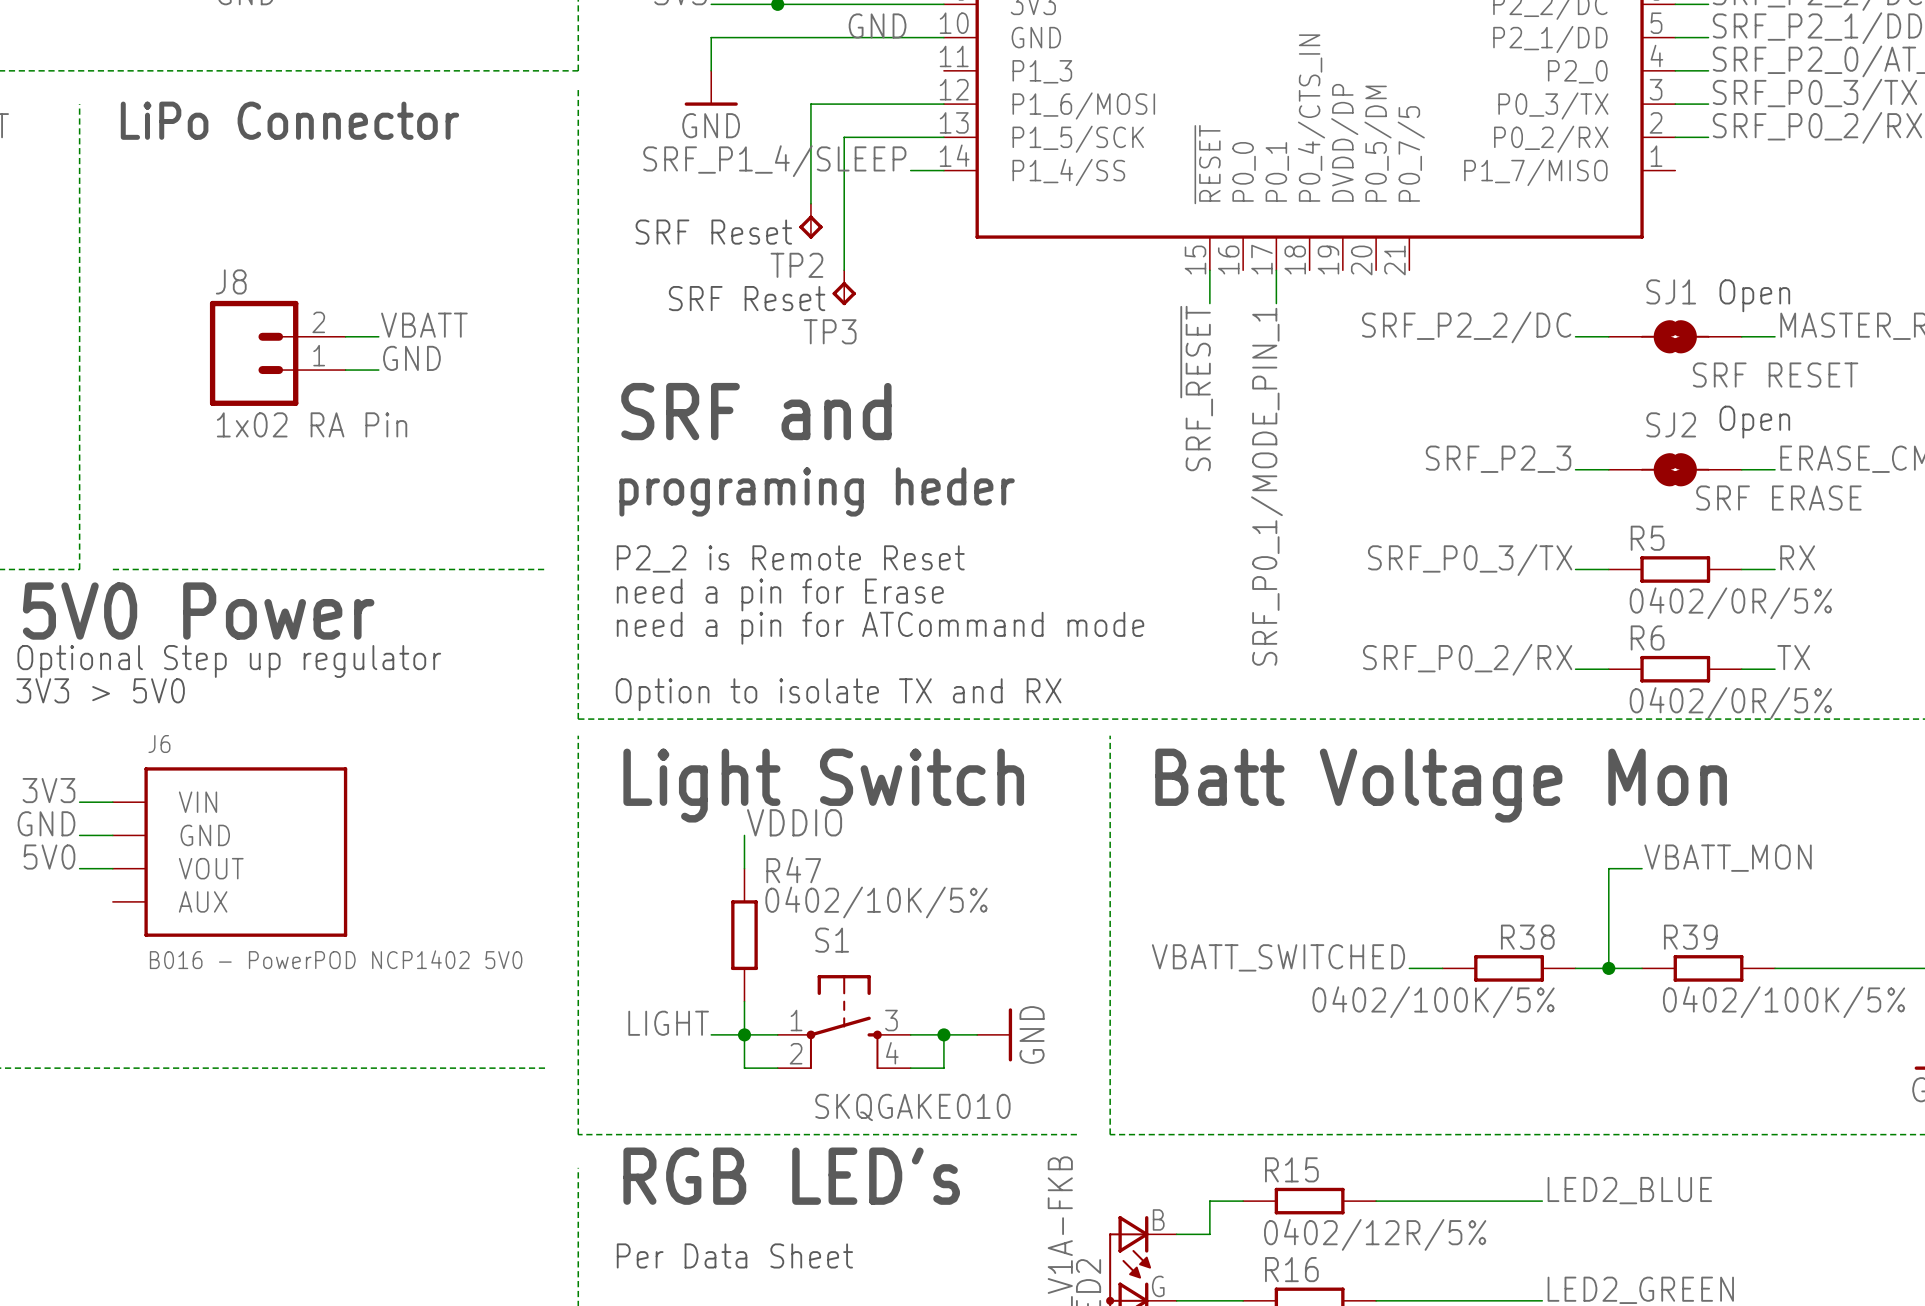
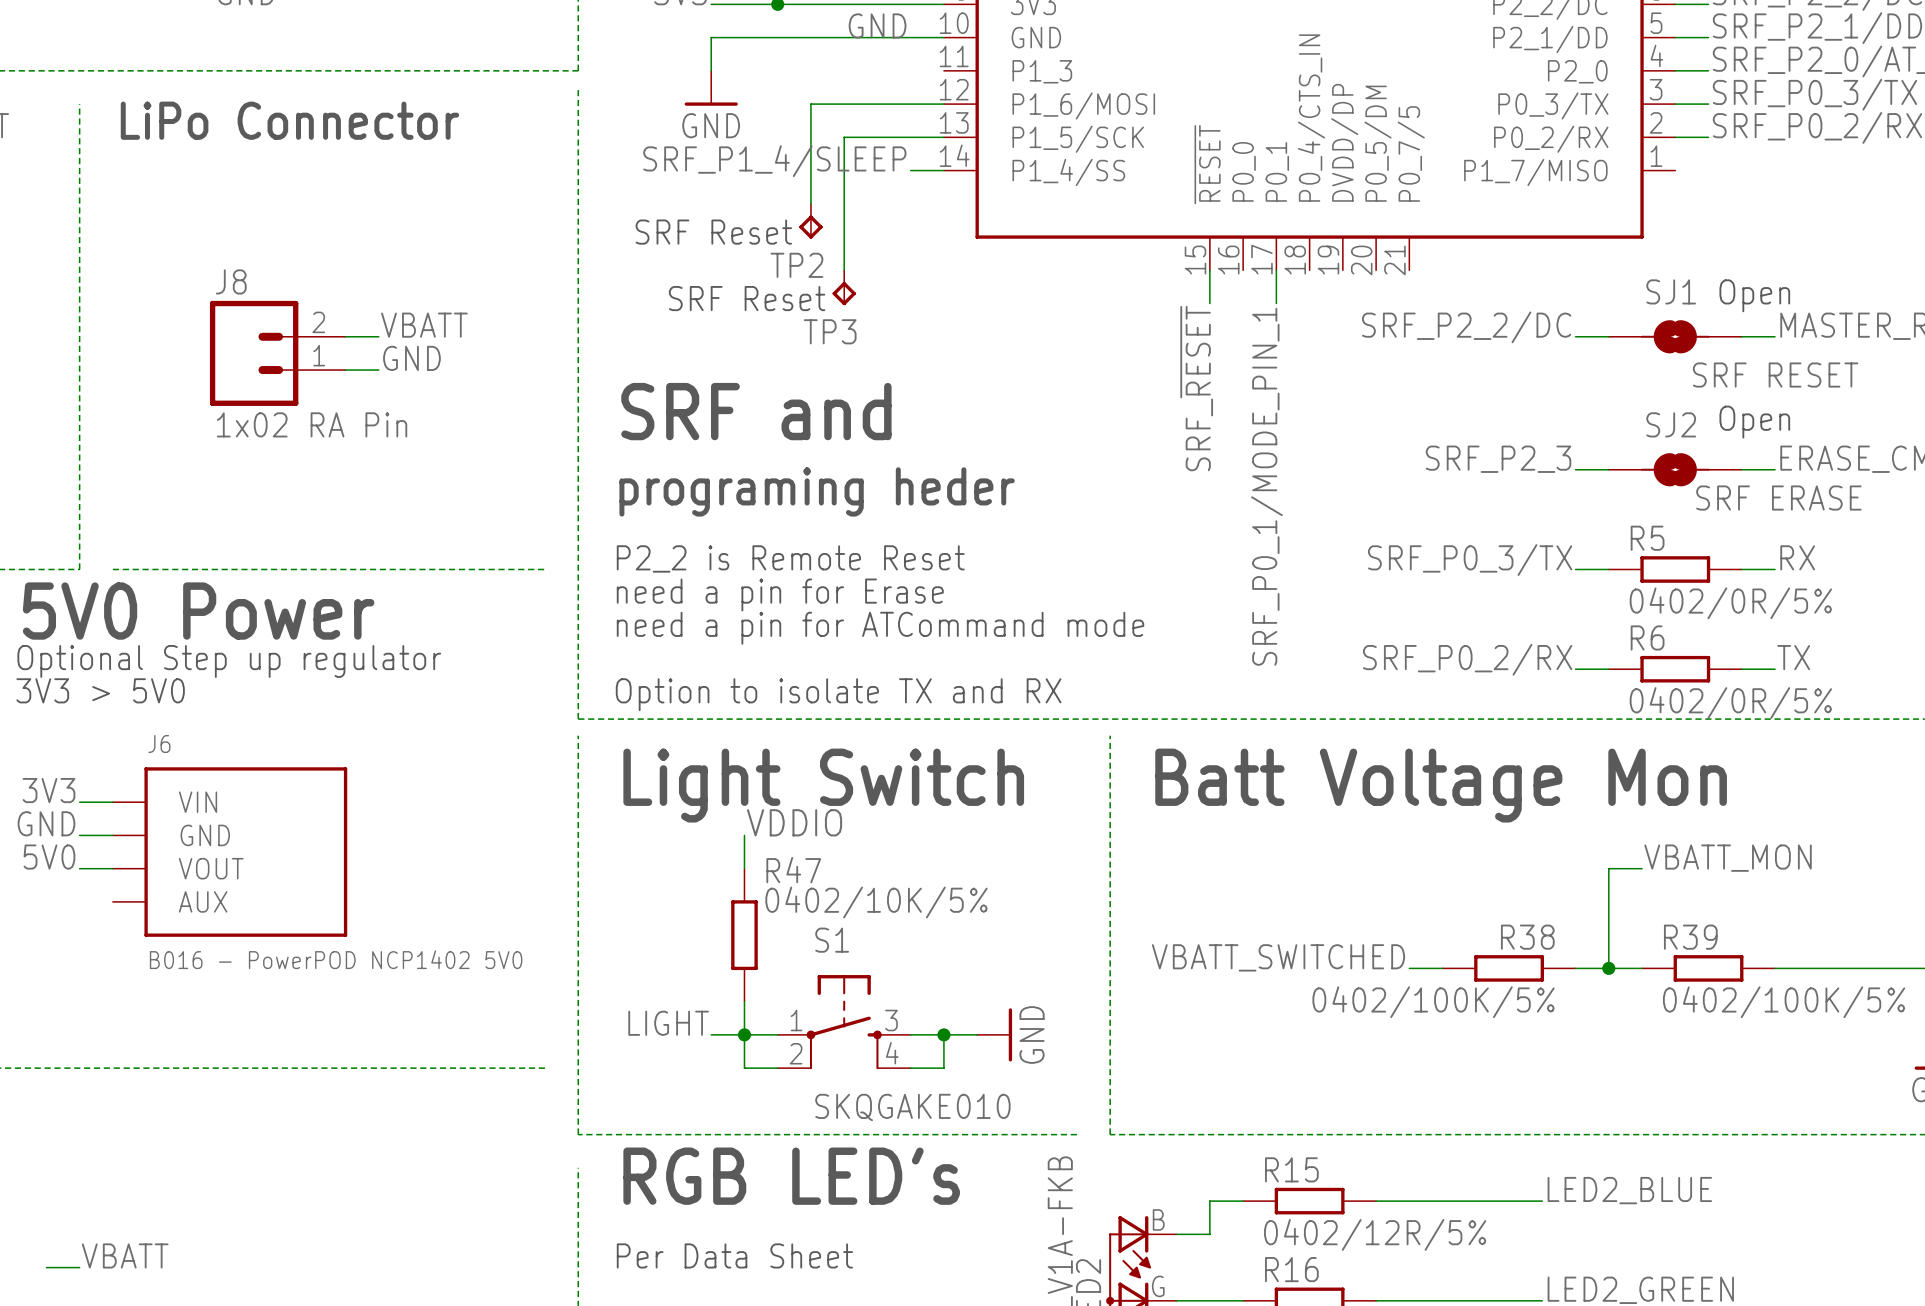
label: none -> VBATT (125, 1255)
wire: none -> (46, 1267) (79, 1267)

